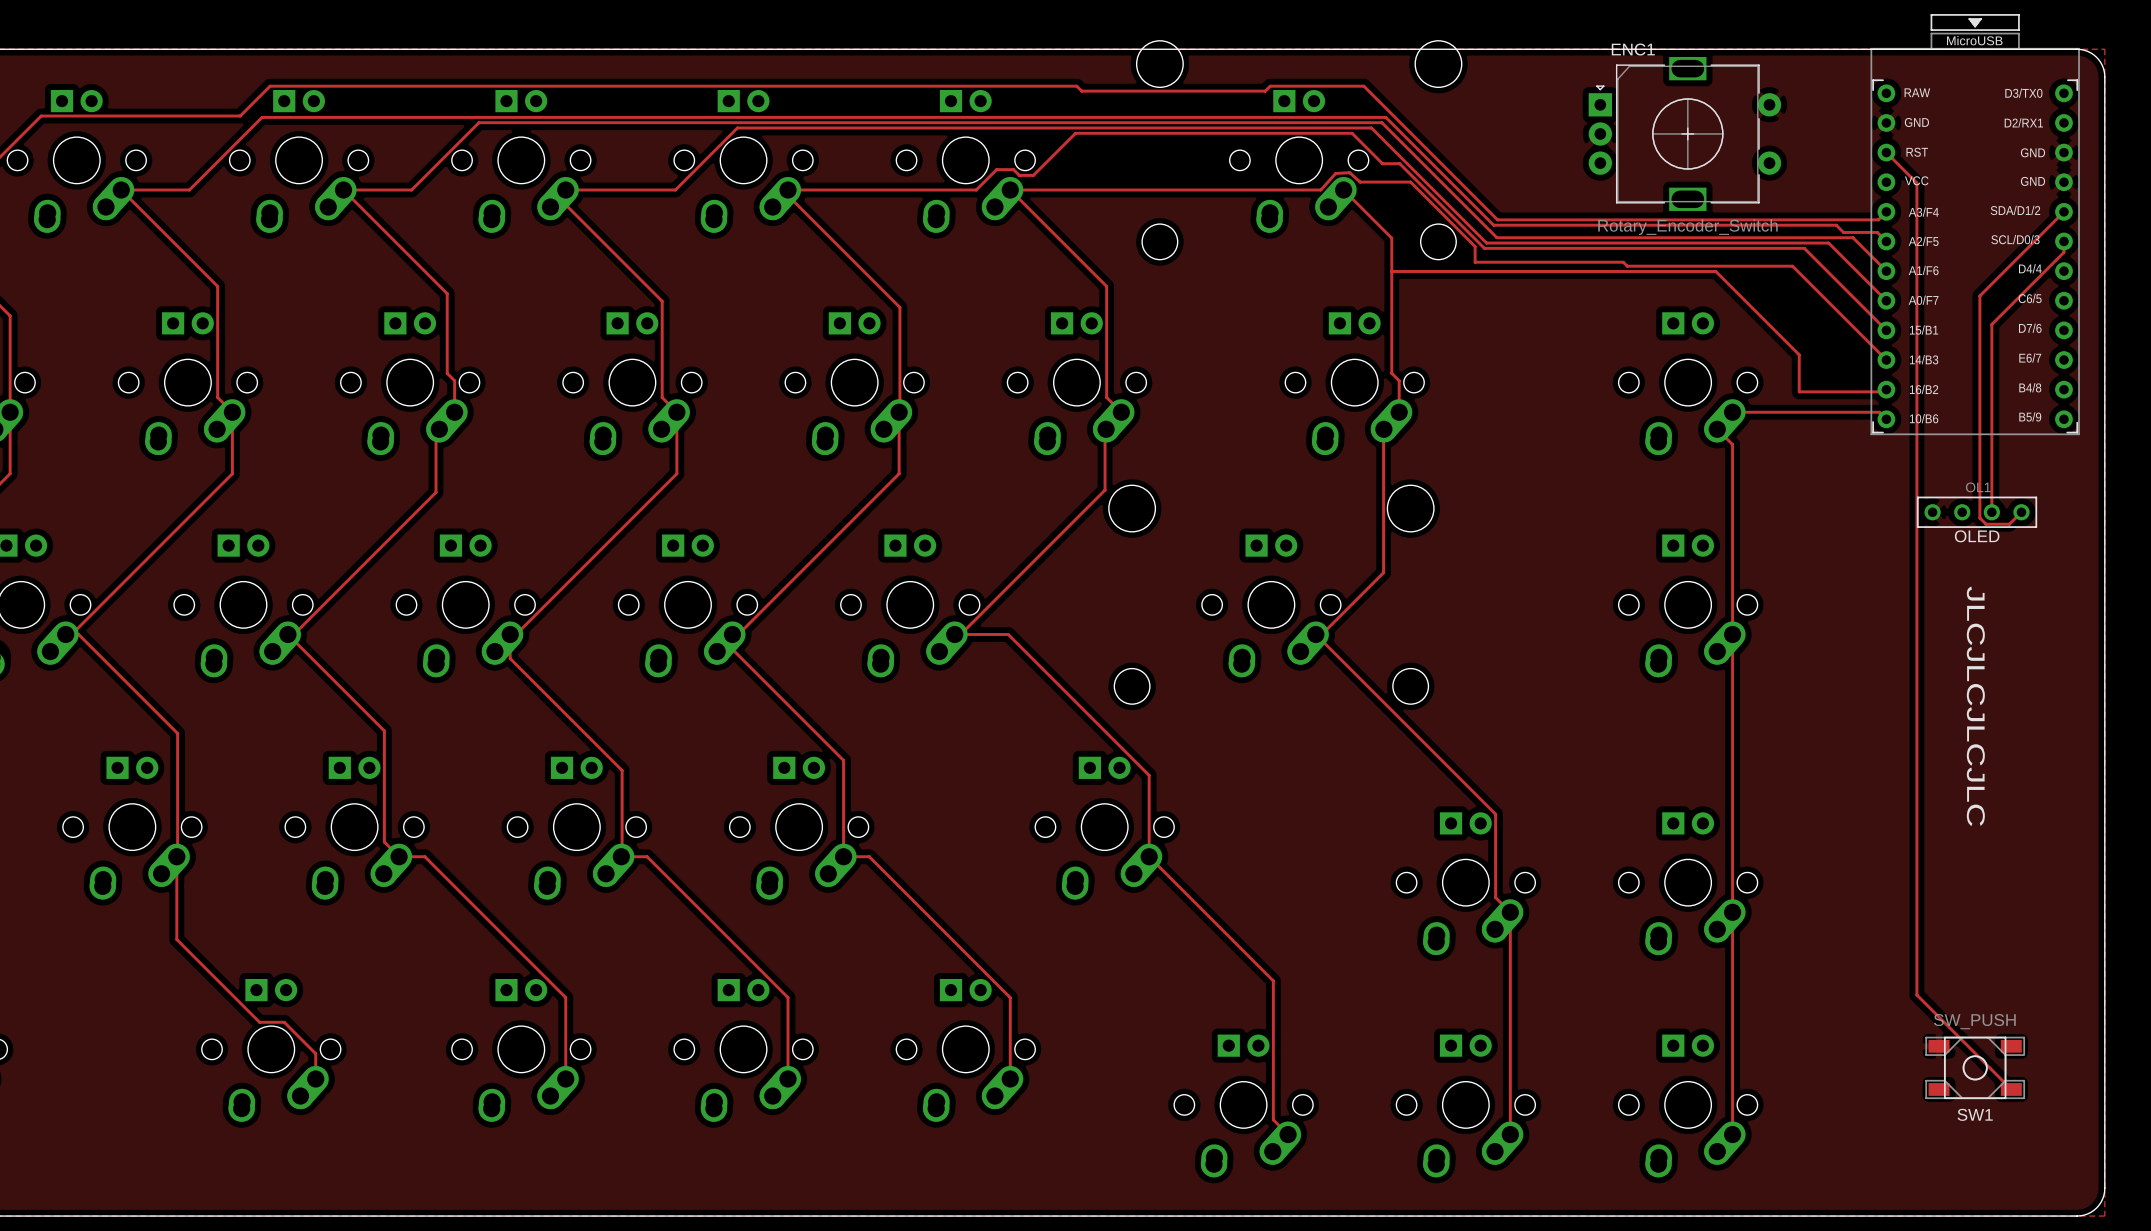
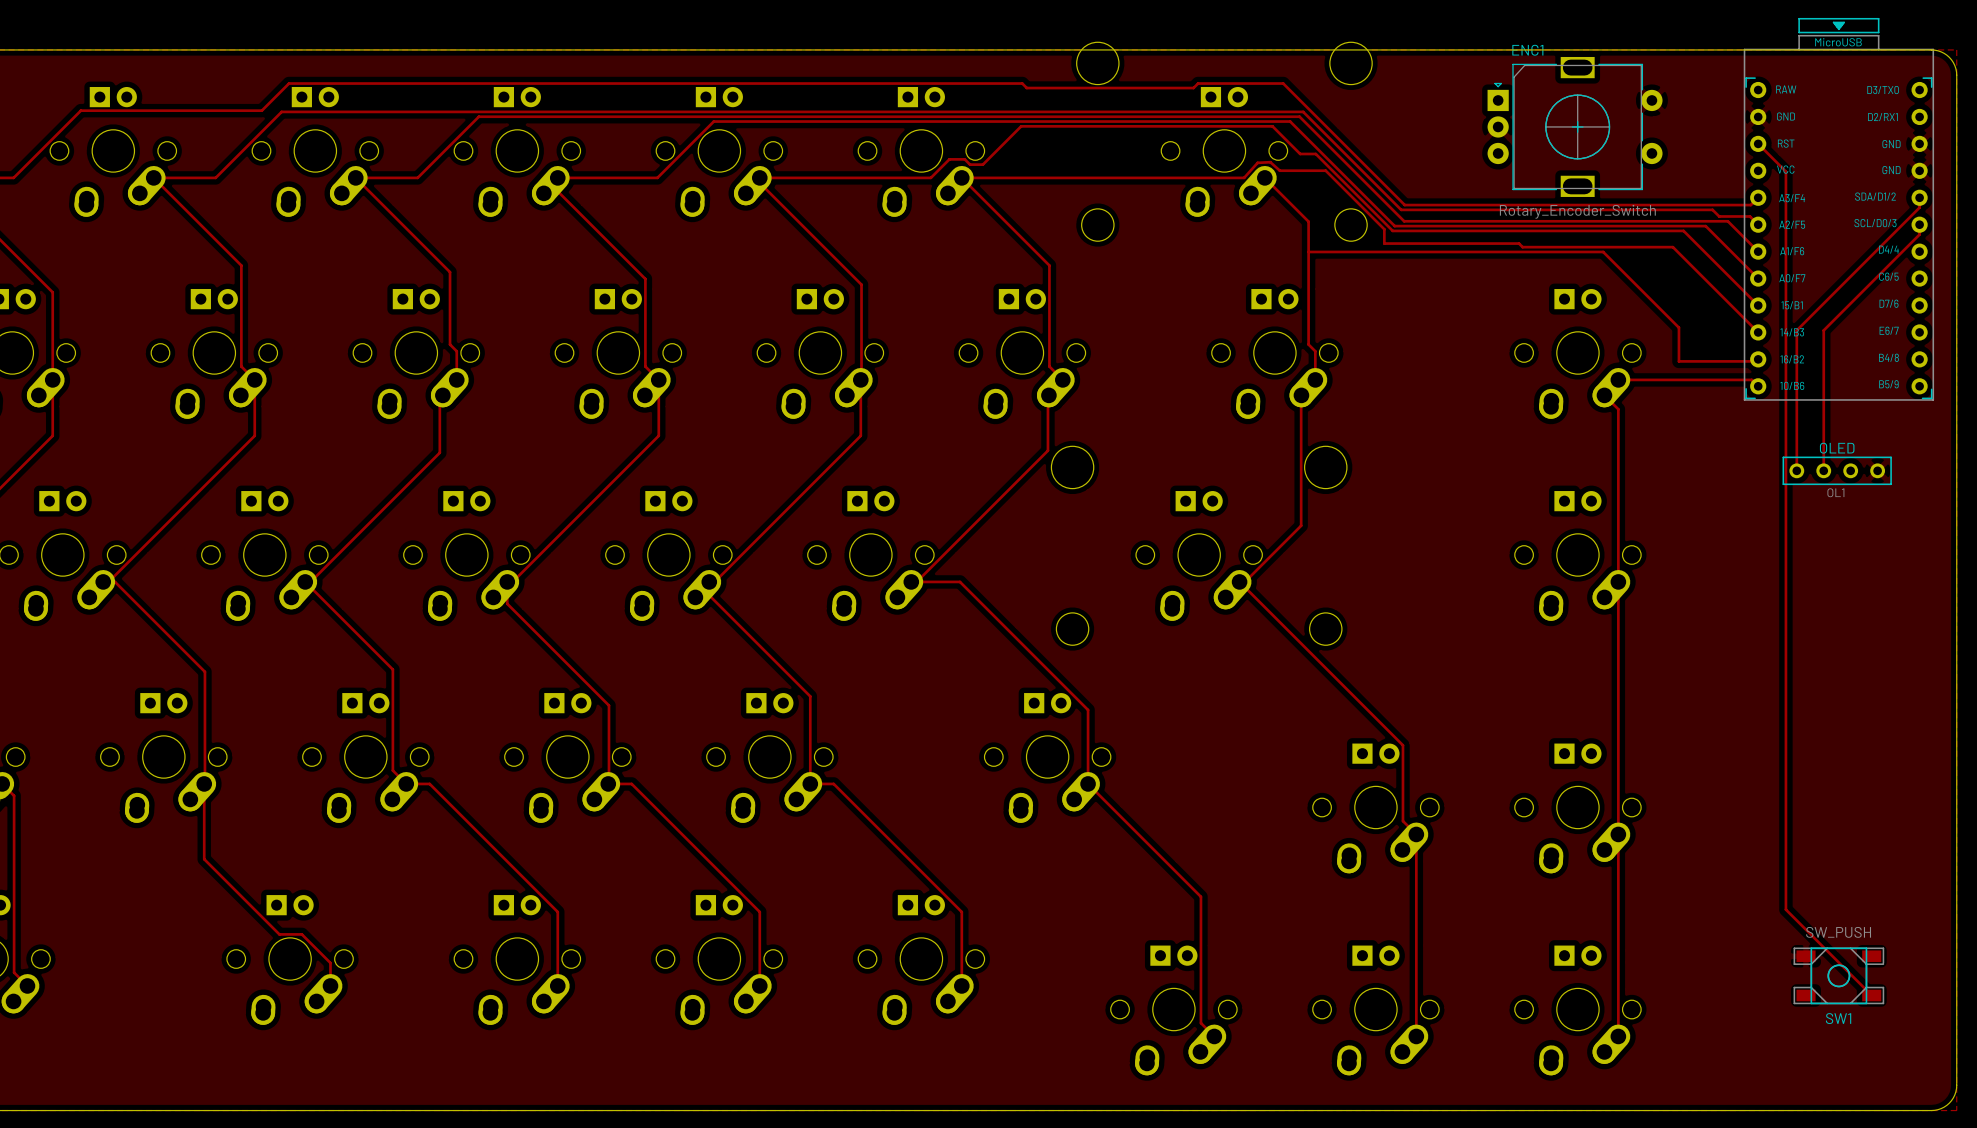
track: (2063, 211) (1979, 295) (1979, 518) (1986, 524) (2009, 524) (2021, 512) -> (1919, 197) (1919, 207) (1796, 330) (1796, 470)
track: (1991, 324) (1991, 512) -> (1854, 300) (1823, 330) (1823, 470)
OL1 rotation: 0° (1977, 512) -> 180° (1837, 470)
text: JLCJLCJLCJLC (1975, 706) -> none

